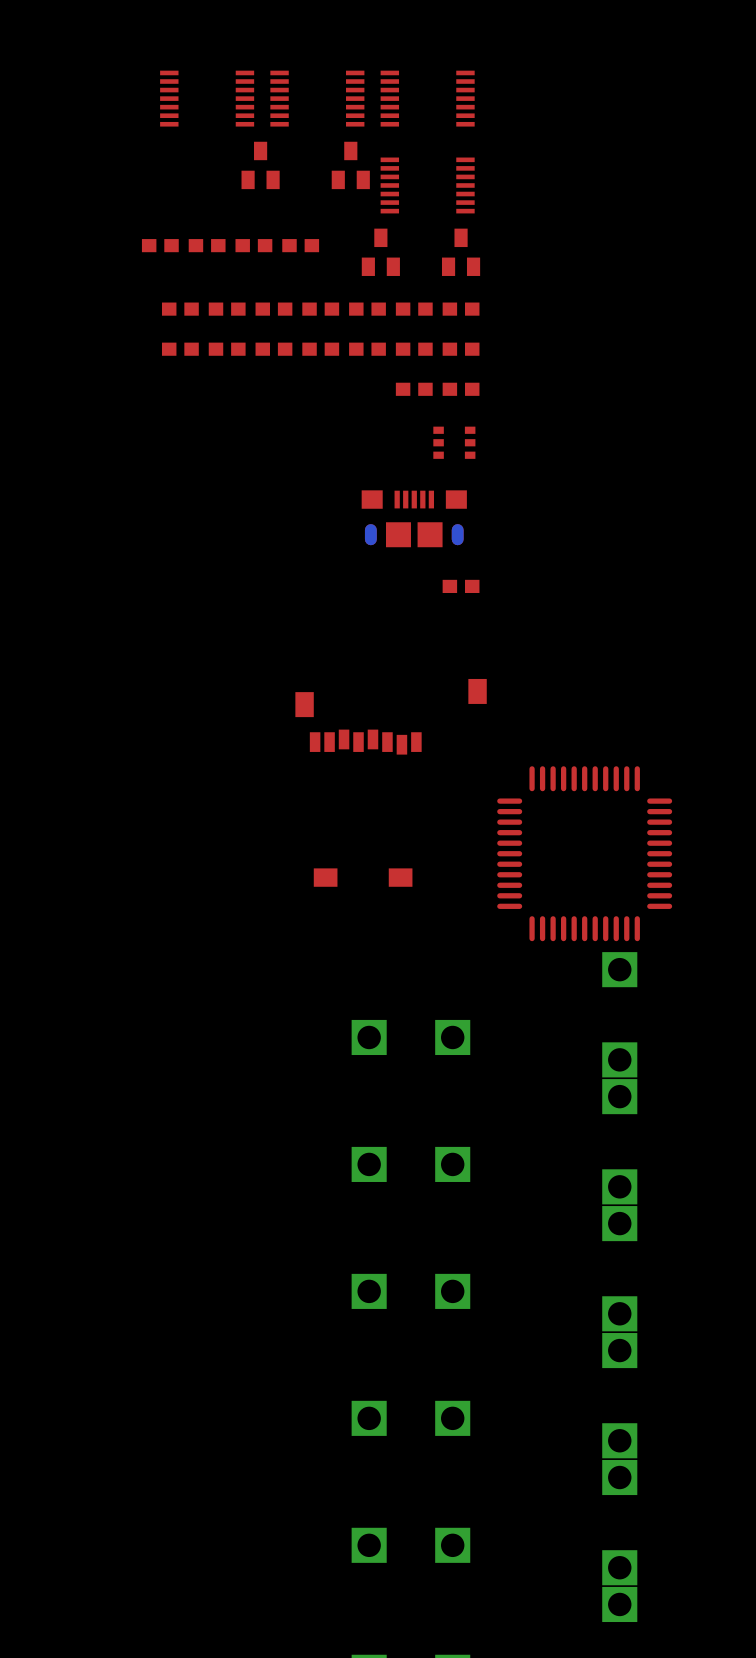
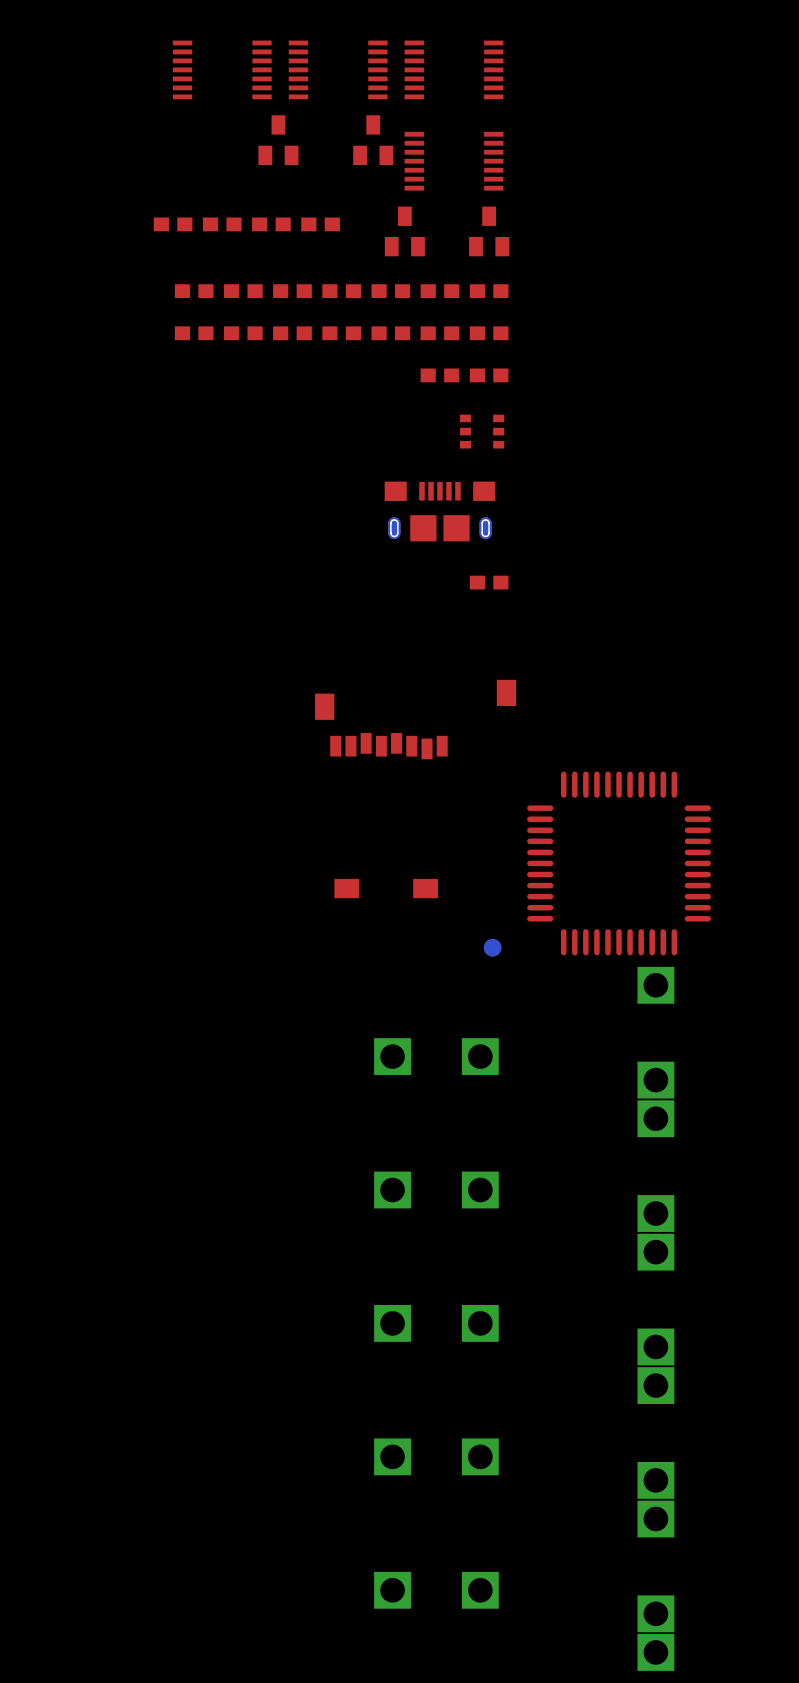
part footprint: [361, 490, 467, 548] -> [384, 481, 496, 542]
part: none -> (492, 947)

